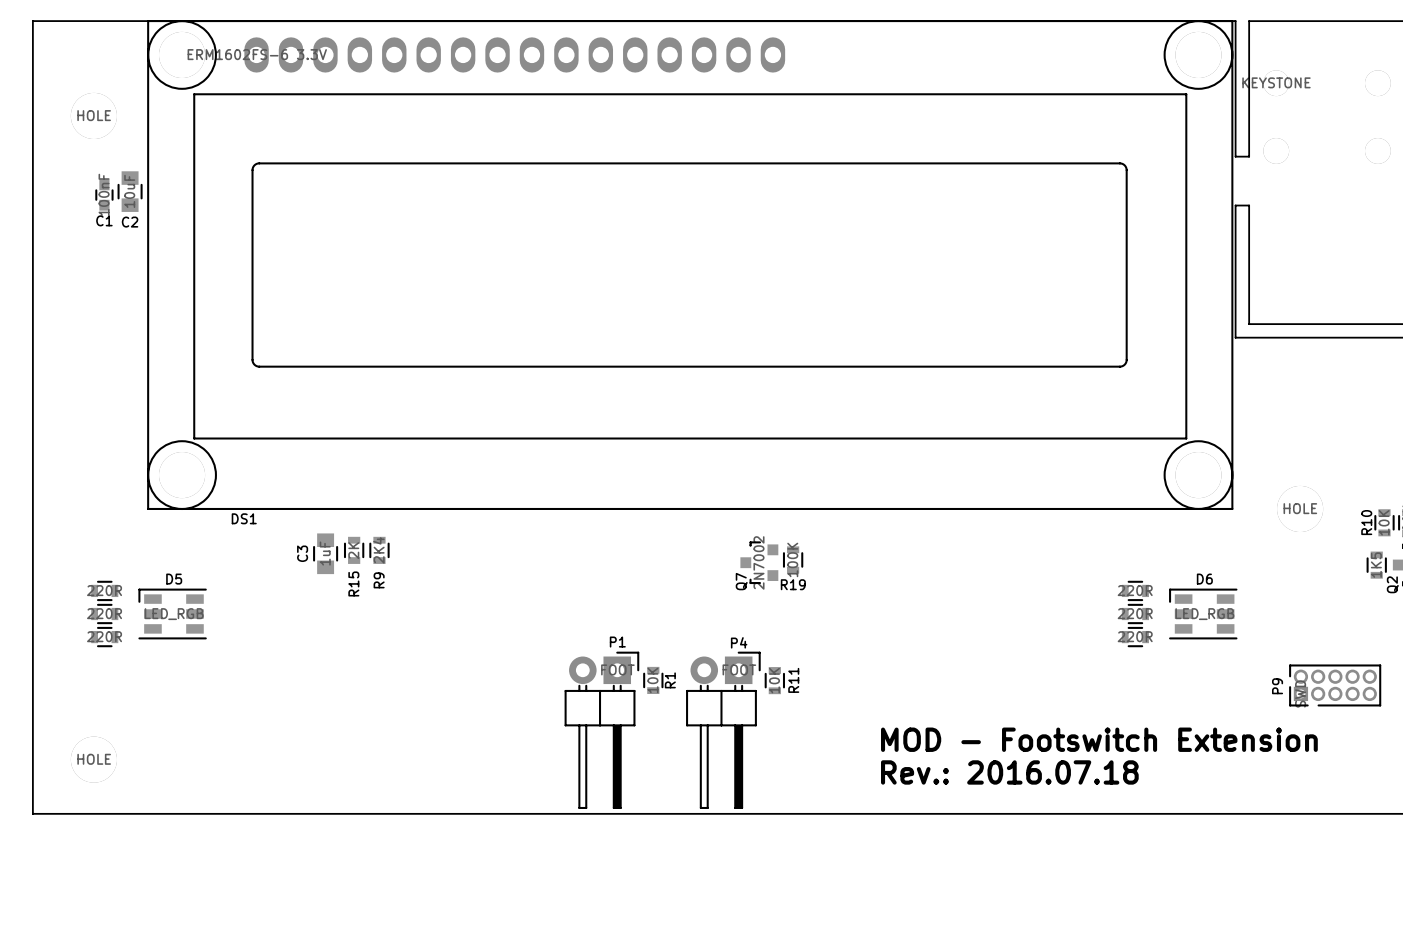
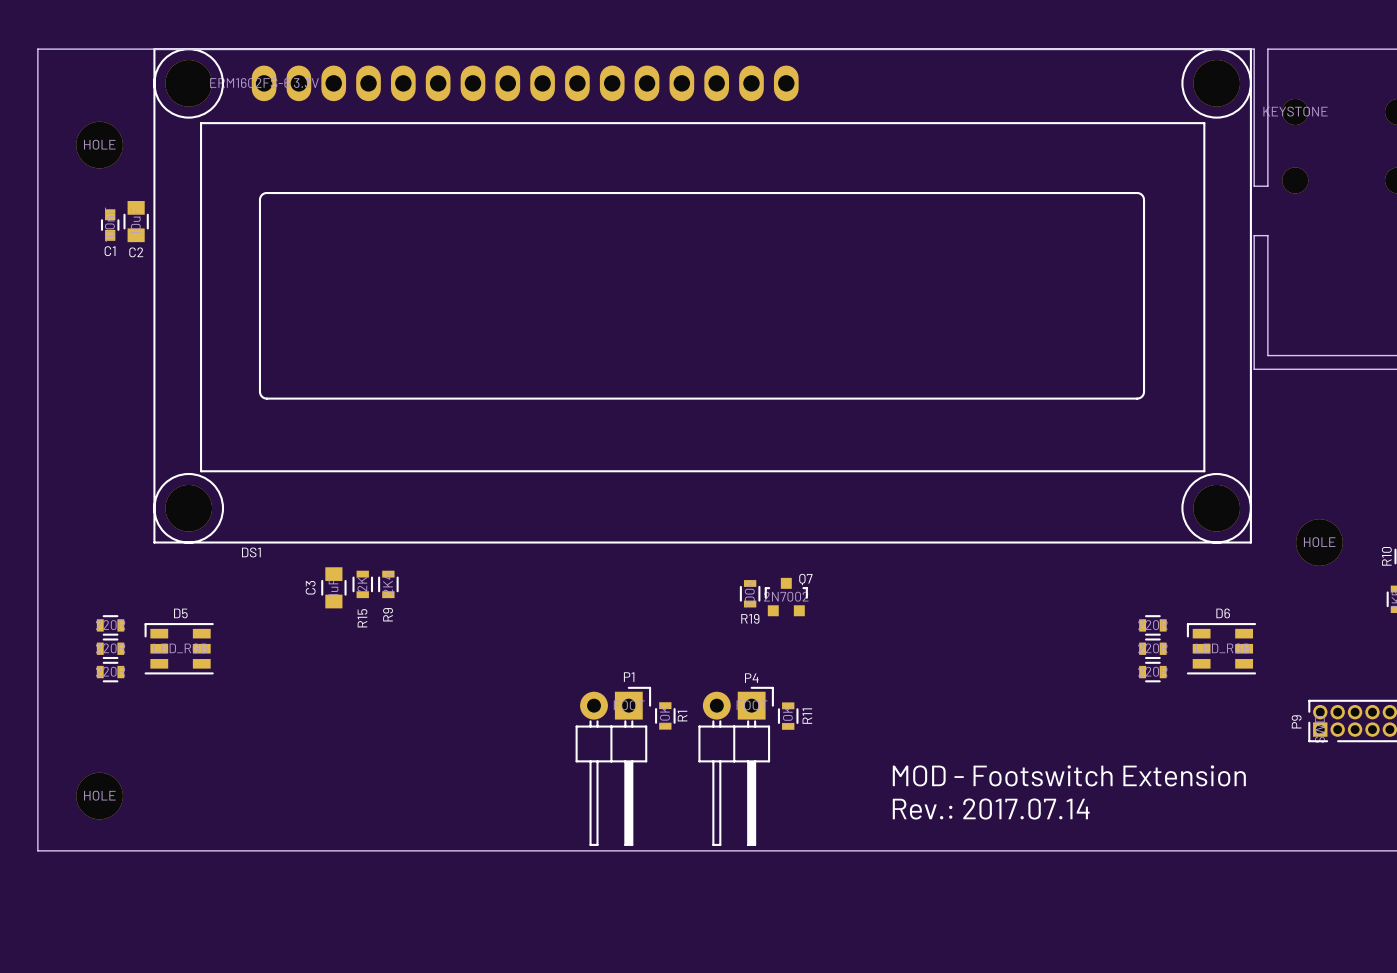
R19 position: (793, 559) -> (750, 593)
Q7 rotation: 0° (759, 562) -> 90° clockwise (786, 597)
Q7 name position: Q7 (741, 581) -> Q7 (805, 579)
text: Rev.: 2016.07.18 (1009, 772) -> Rev.: 2017.07.14 (991, 809)

